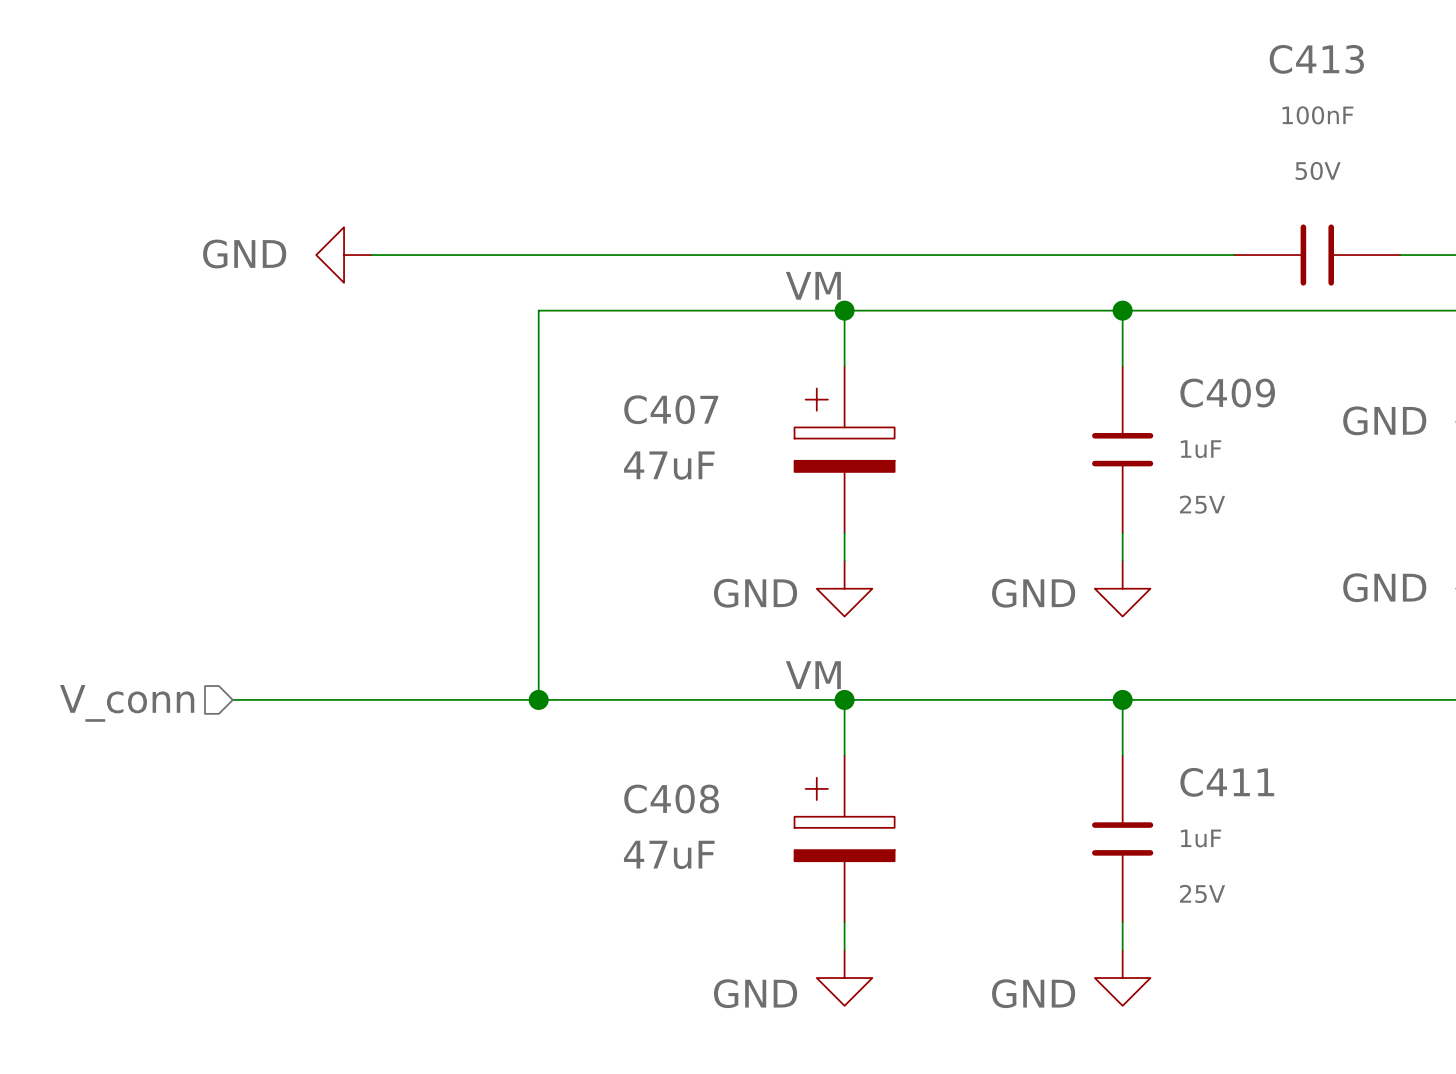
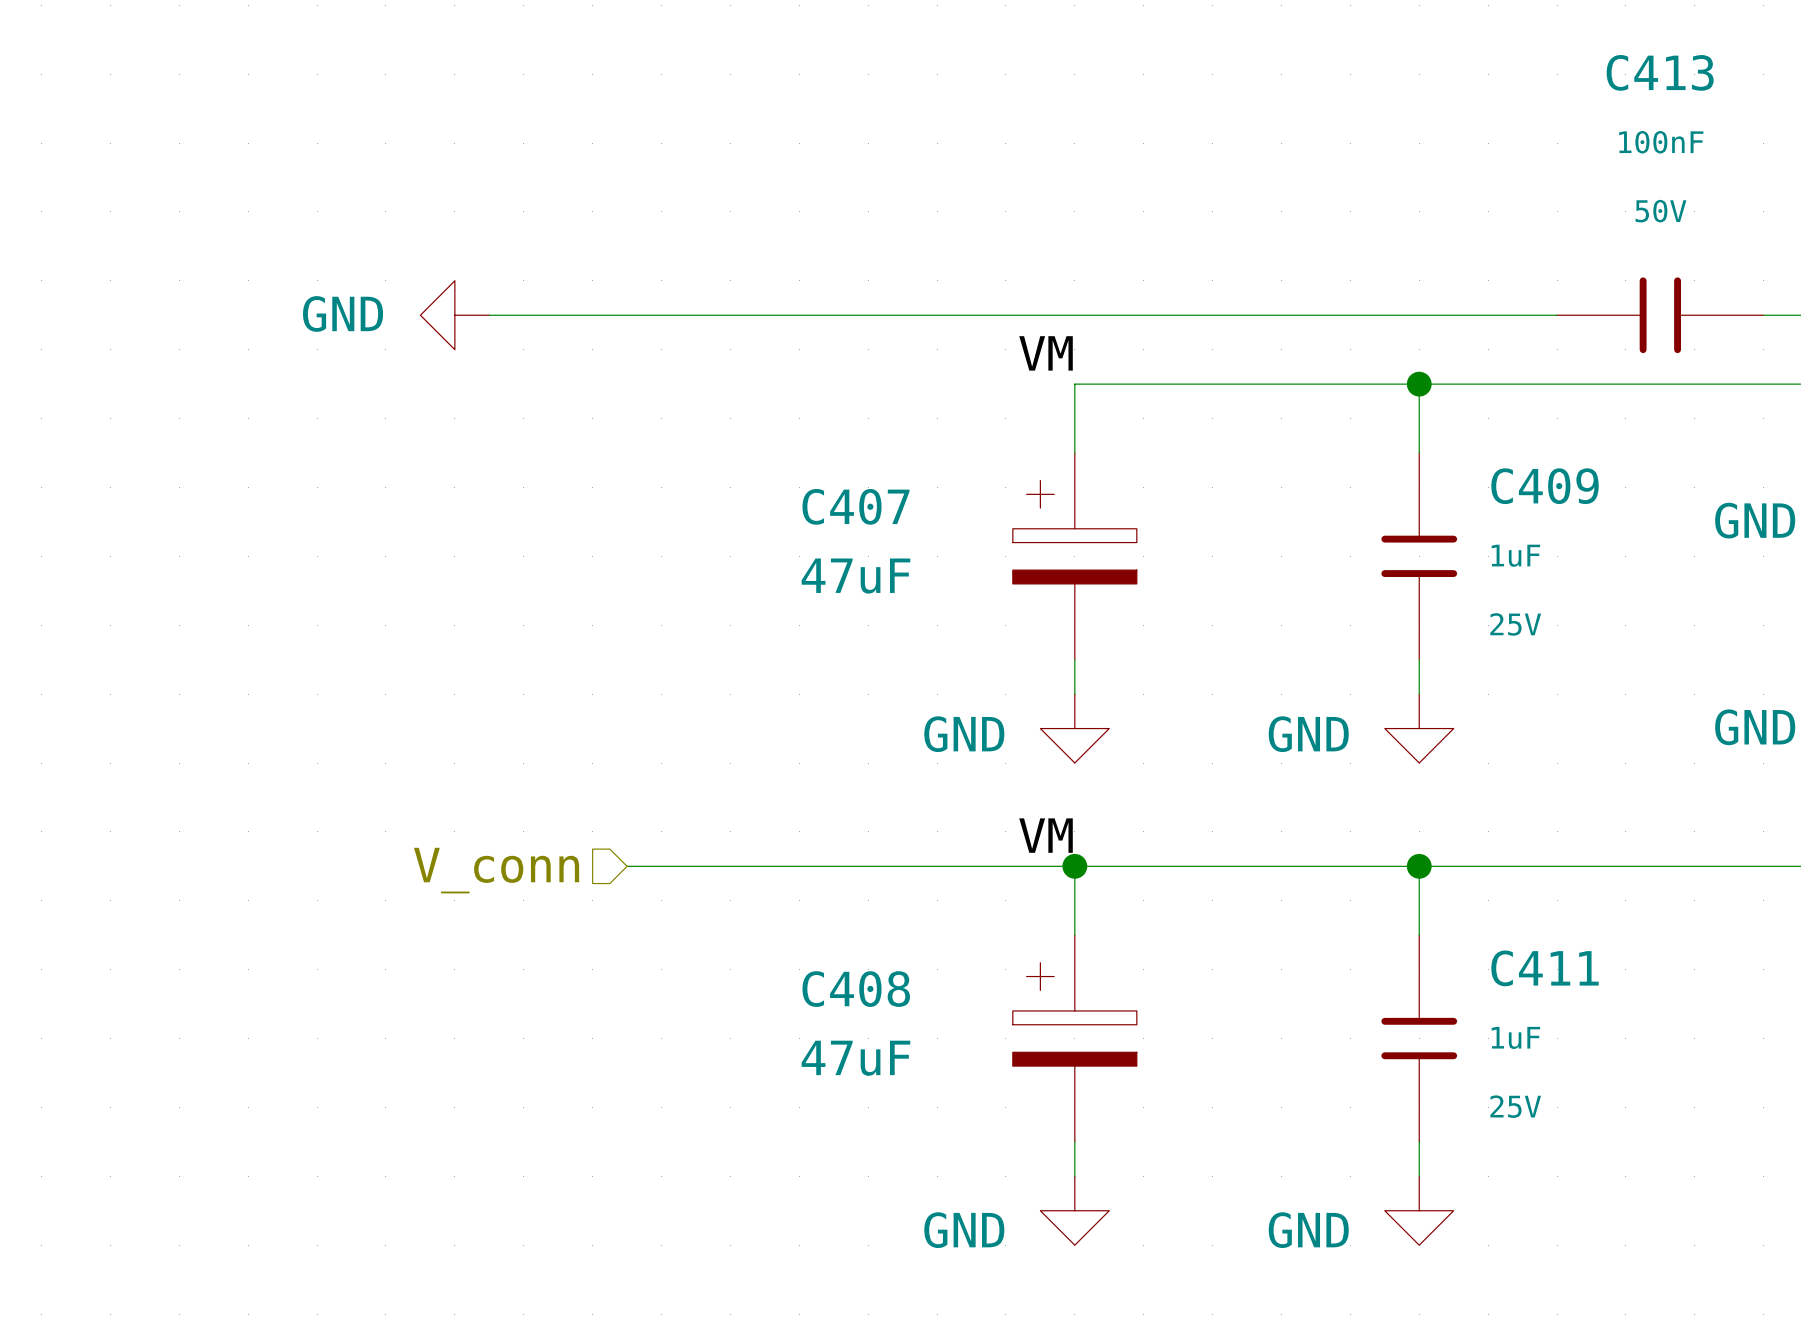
wire: (844, 310) (538, 310) (538, 699) -> none
junction: (844, 310) -> none
wire: (232, 699) (483, 699) -> none
junction: (538, 699) -> none
hierarchical label position: V_conn (127, 703) -> V_conn (496, 870)

